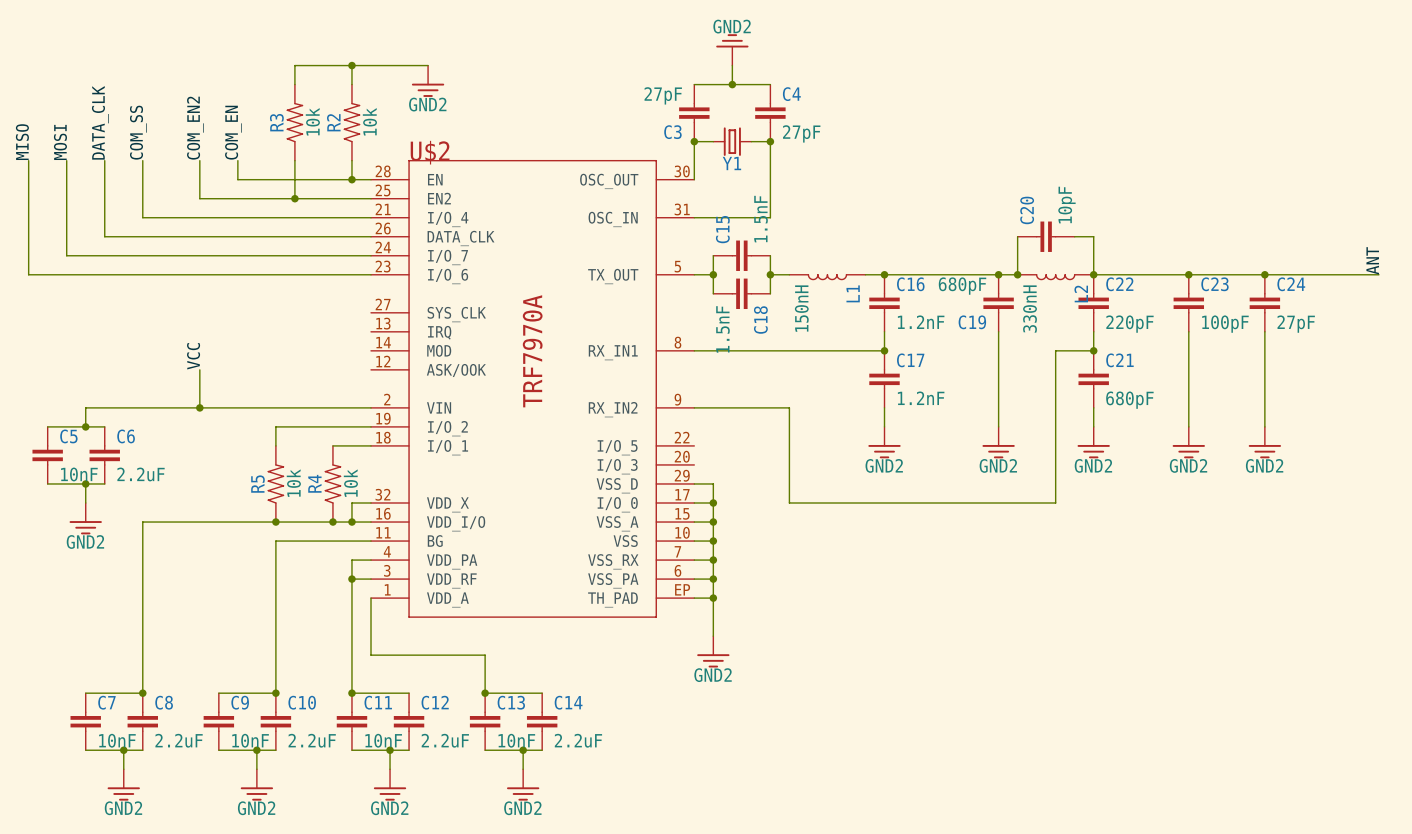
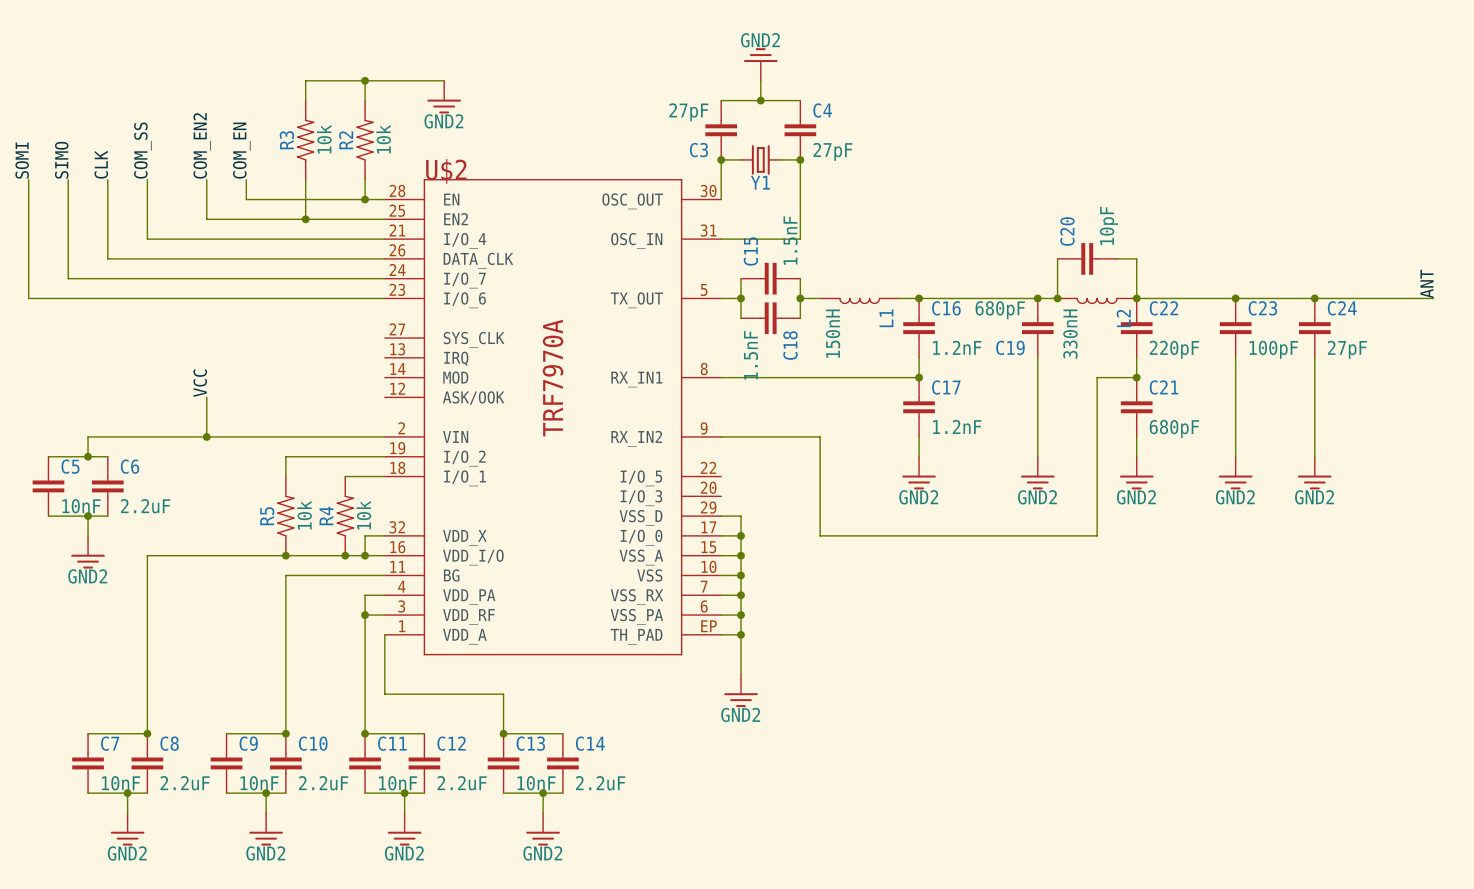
label: DATA_CLK (100, 122) -> CLK (101, 164)
label: MISO (22, 142) -> SOMI (22, 160)
label: MOSI (60, 142) -> SIMO (61, 160)

